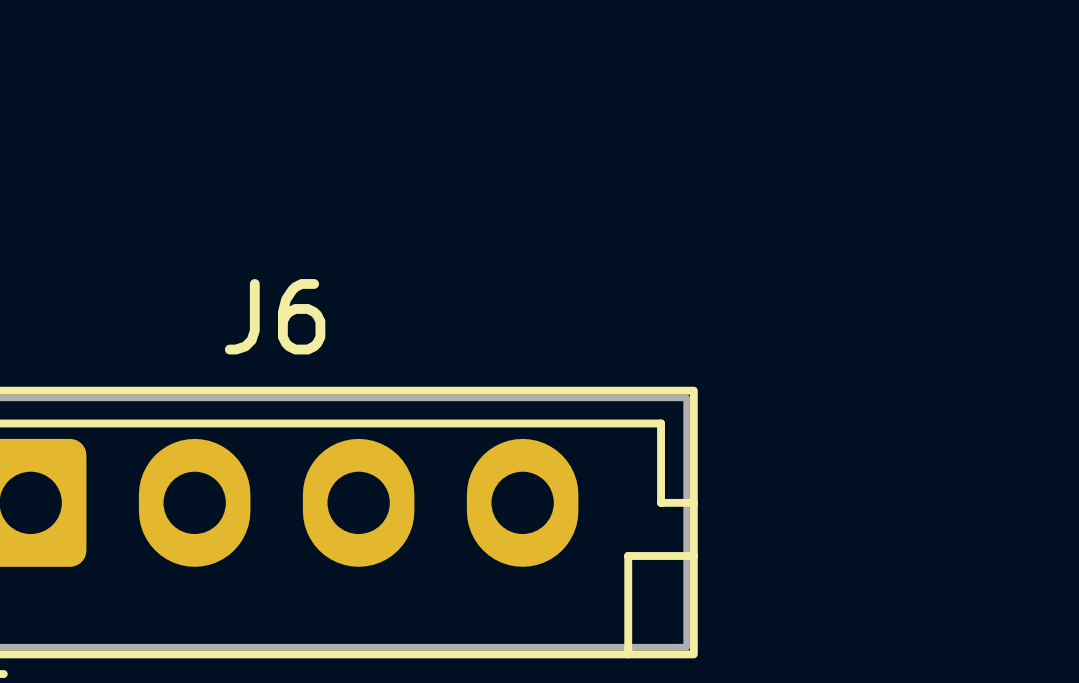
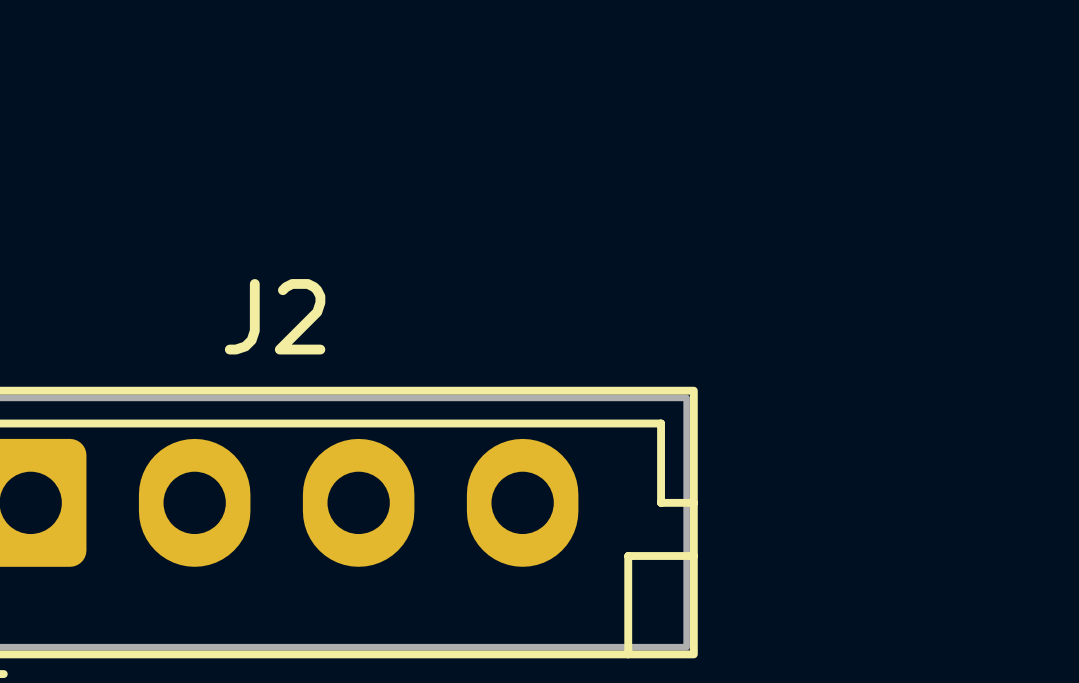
J6 name: J6 (275, 316) -> J2 (275, 316)

